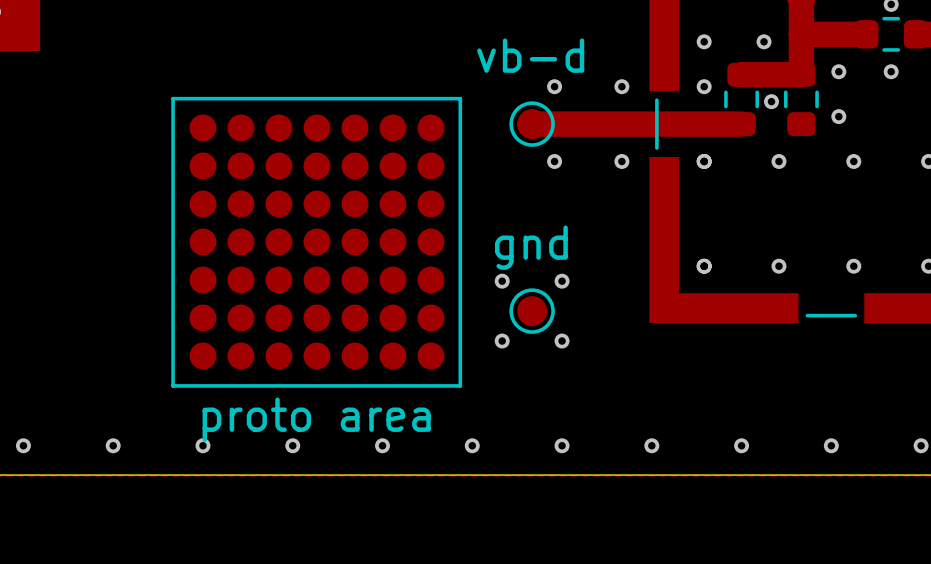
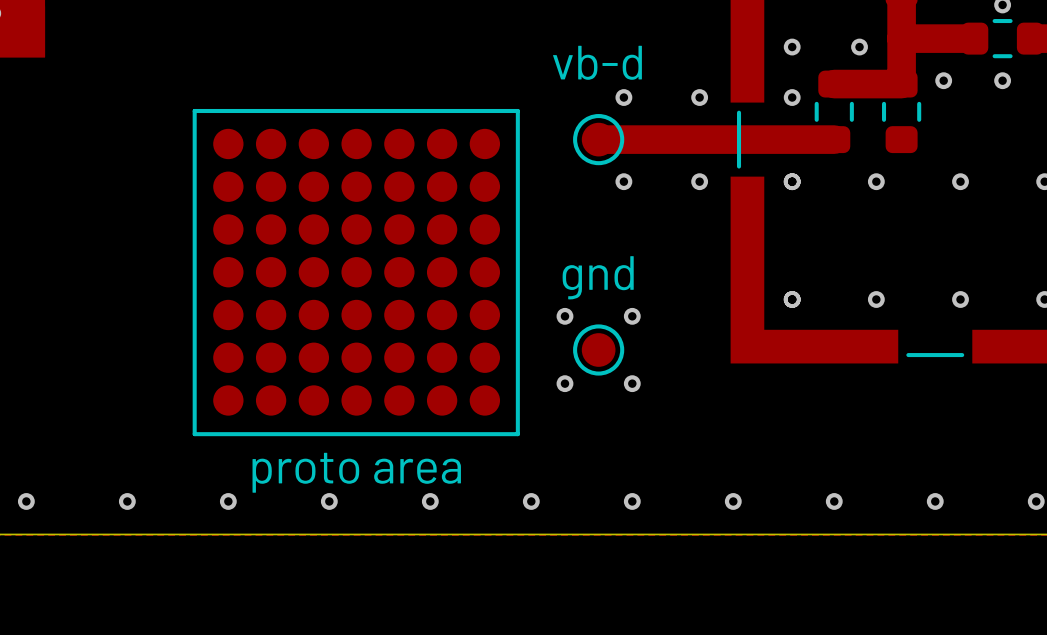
via: (771, 101) -> none
via: (838, 116) -> none

